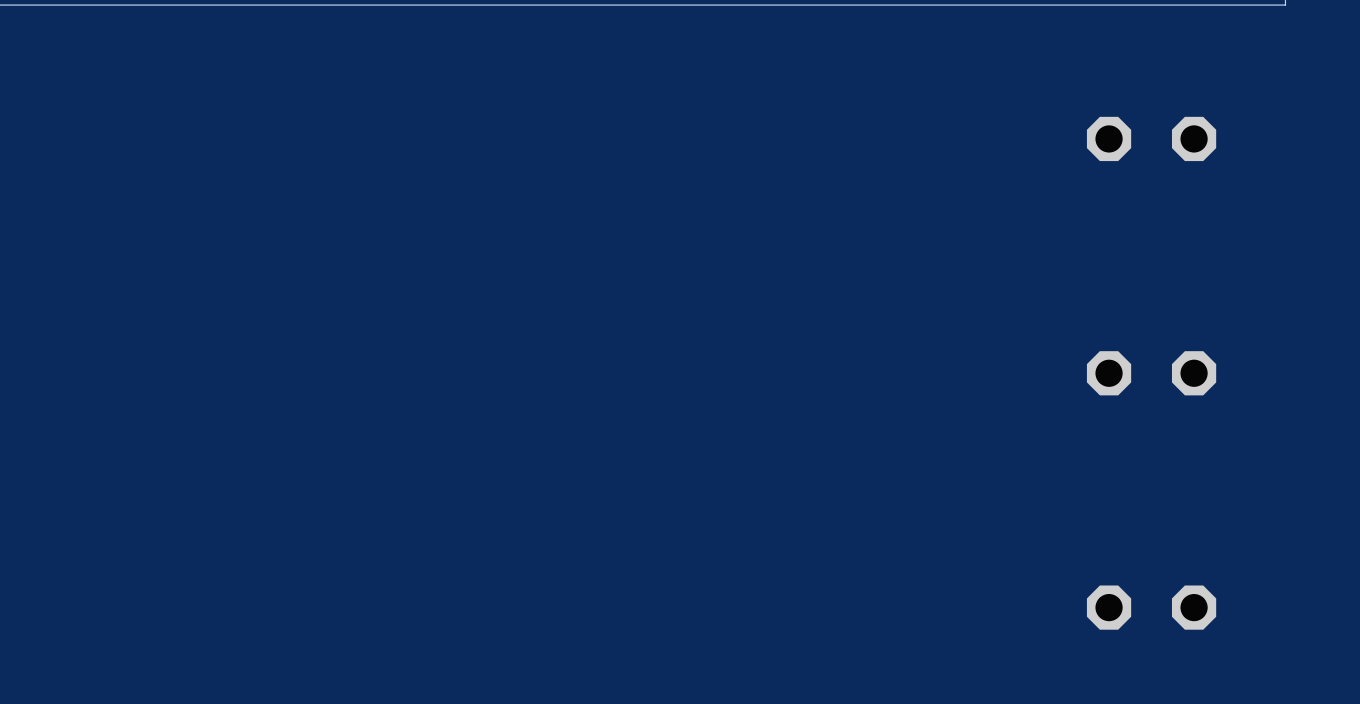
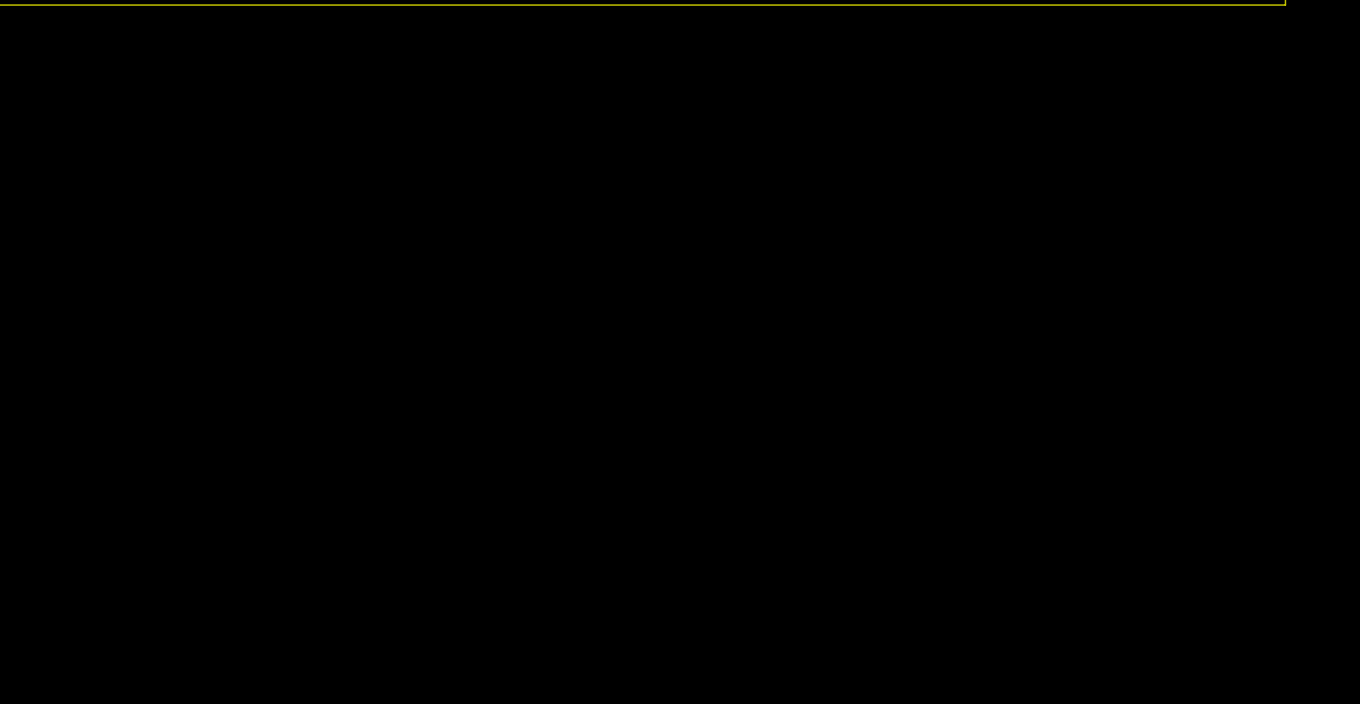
part: (1151, 138) -> none
part: (1151, 373) -> none
part: (1151, 607) -> none

